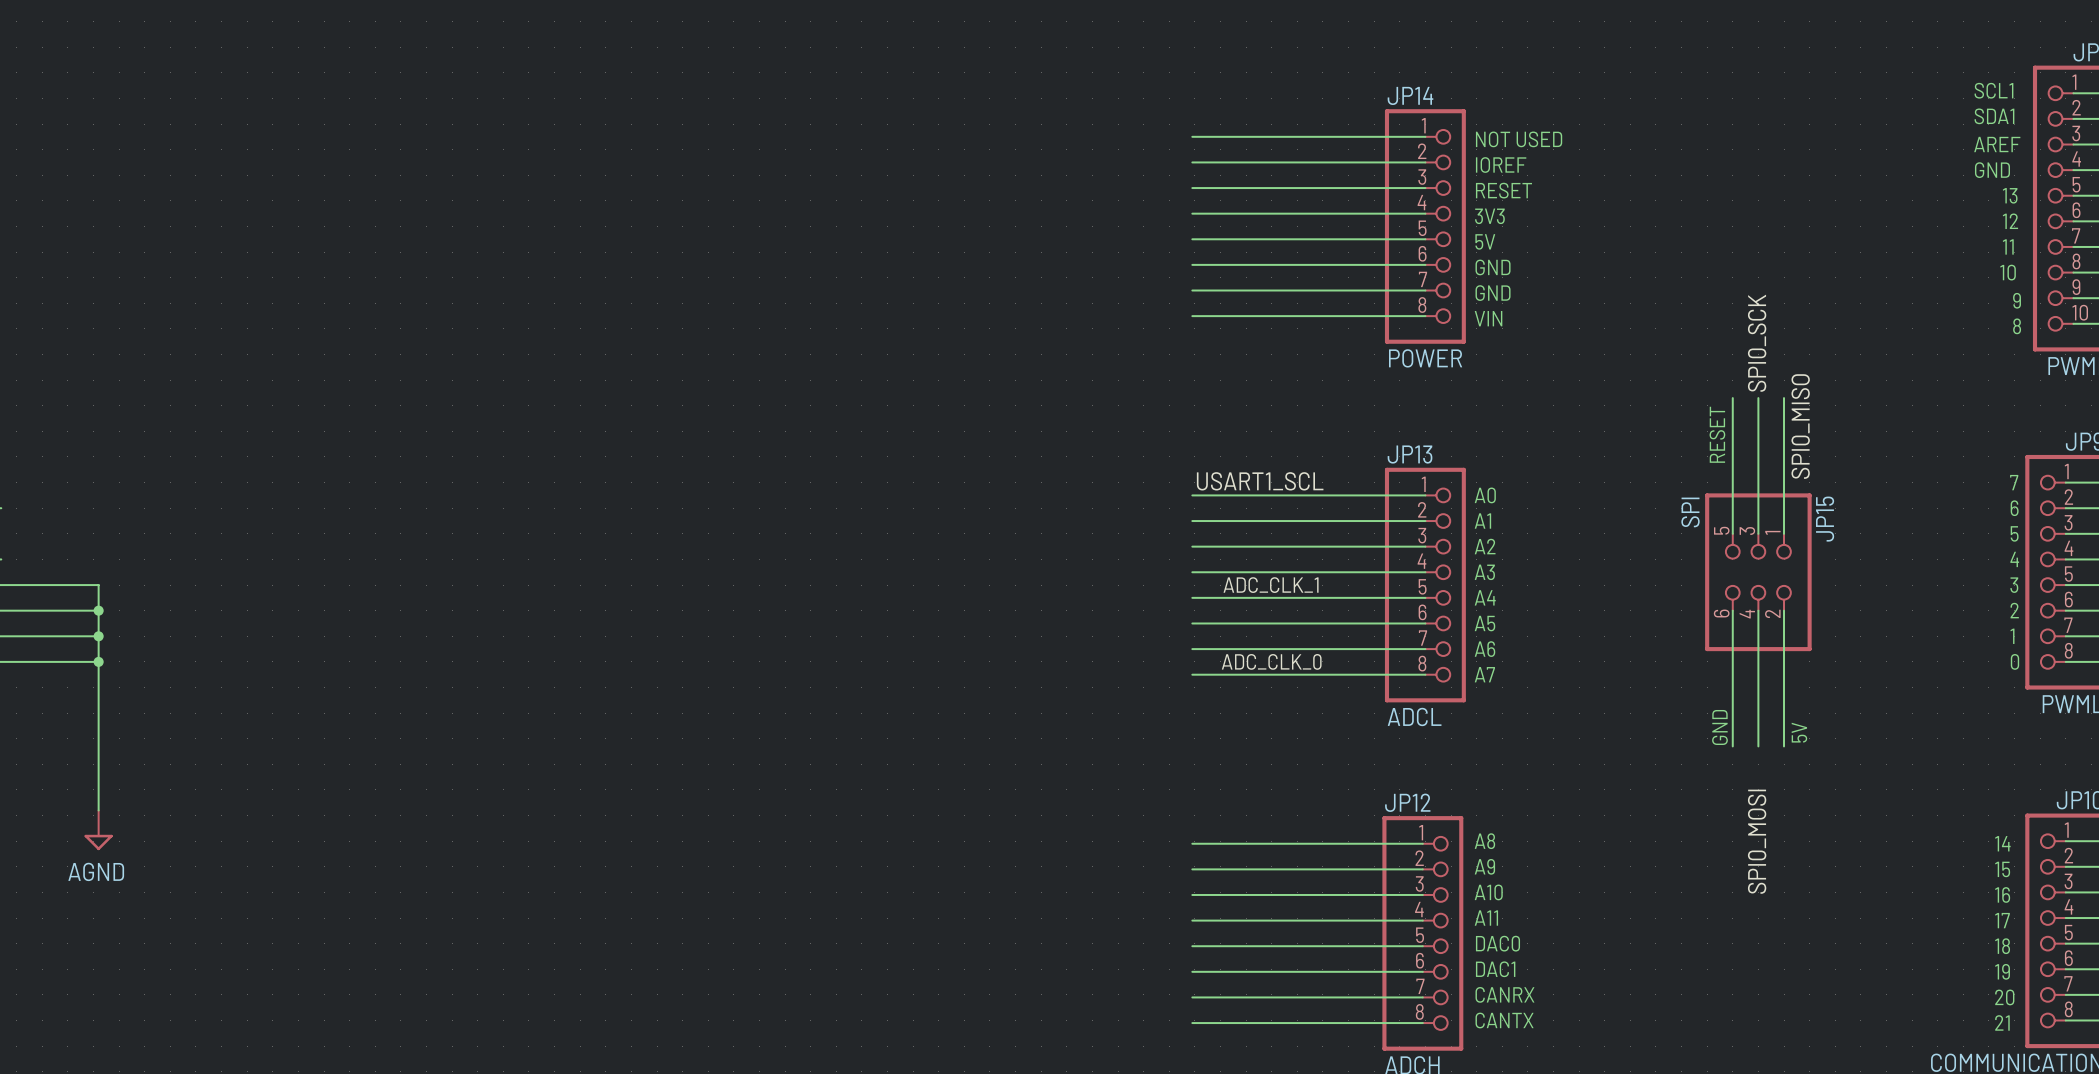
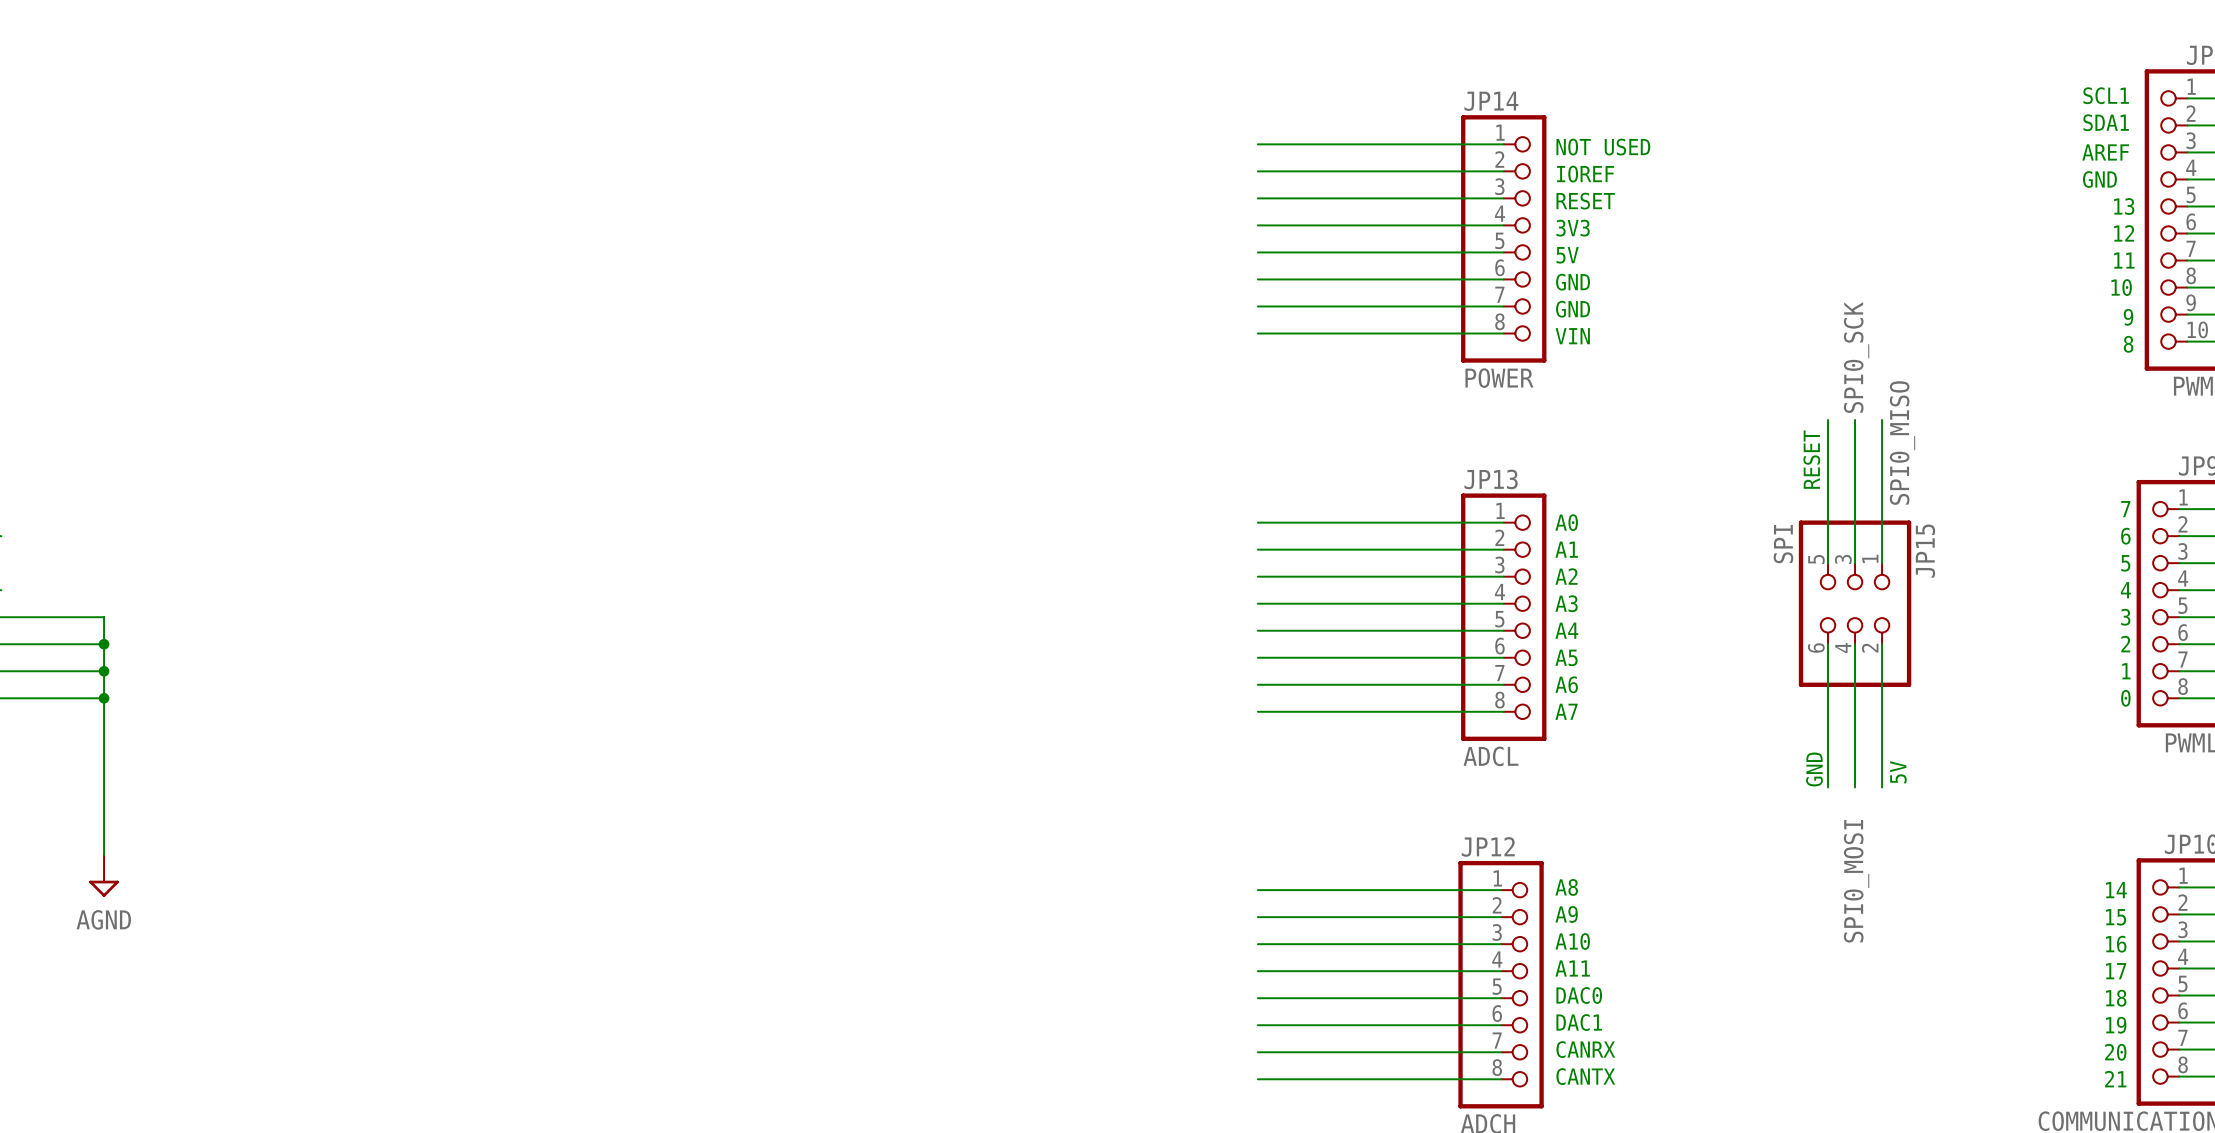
label: USART1_SCL (1260, 481) -> none
label: ADC_CLK_1 (1271, 585) -> none
label: ADC_CLK_0 (1271, 661) -> none

